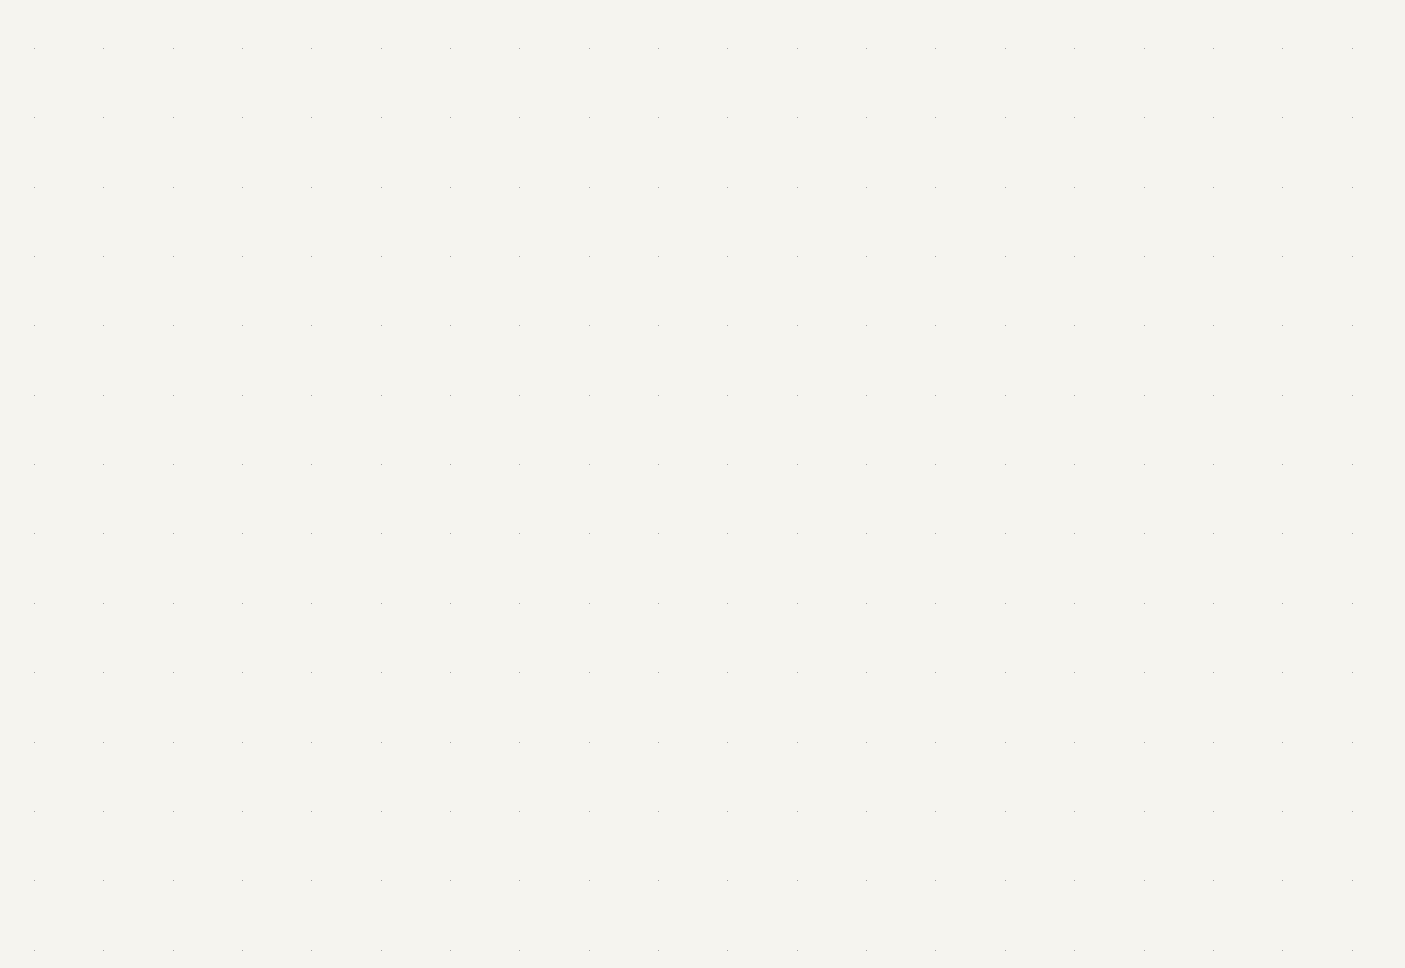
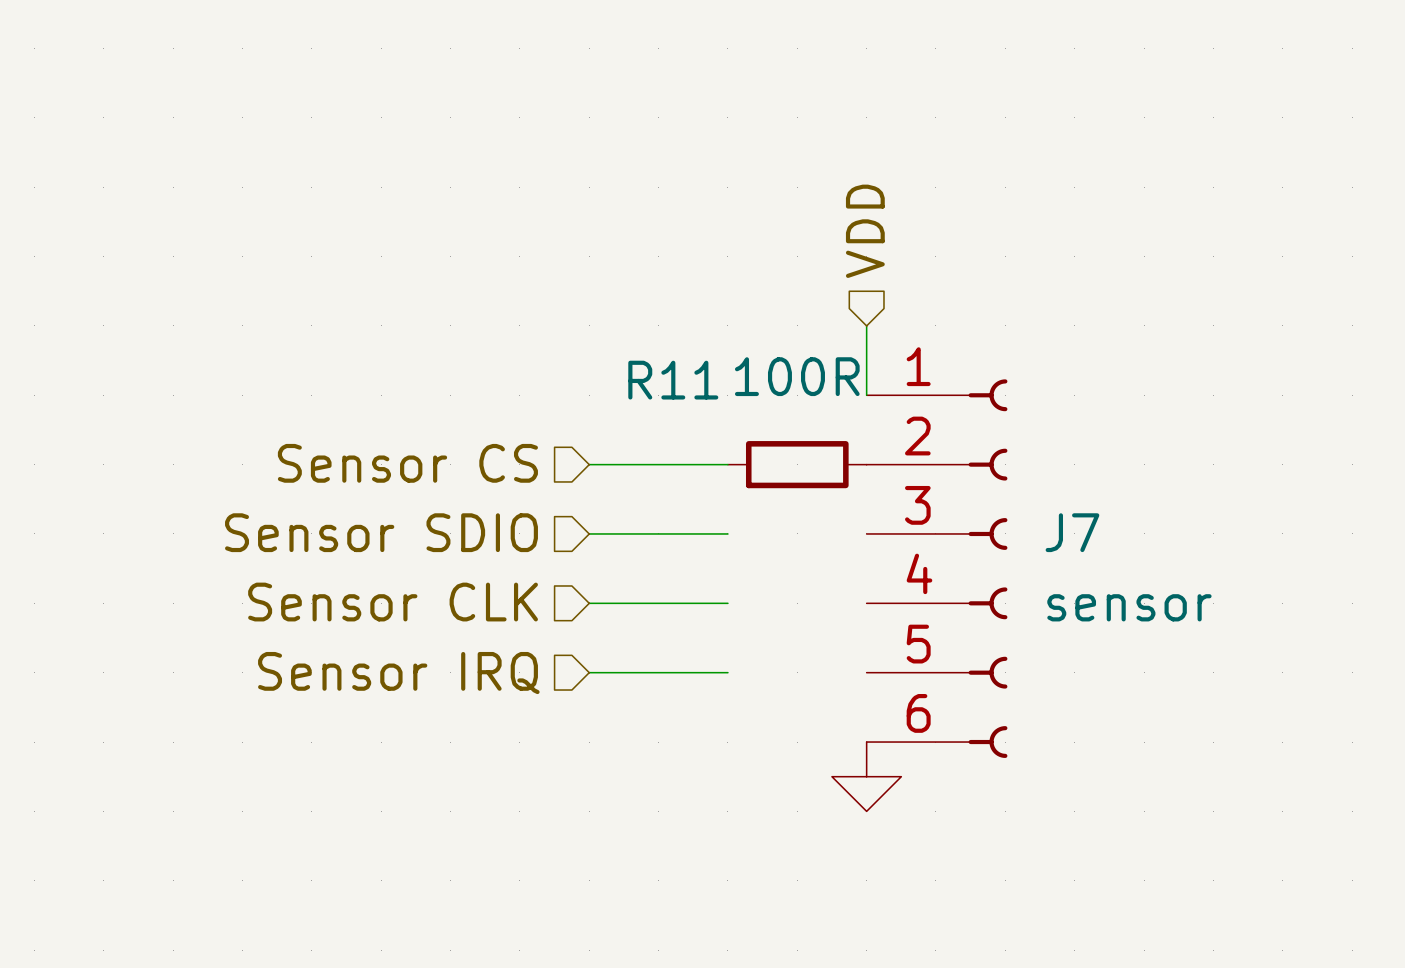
hierarchical label: none -> VDD (865, 231)
wire: none -> (866, 325) (866, 395)
hierarchical label: none -> Sensor CS (407, 463)
wire: none -> (589, 464) (727, 464)
R11: none -> 100R (797, 464)
hierarchical label: none -> Sensor SDIO (381, 532)
wire: none -> (589, 533) (727, 533)
J7: none -> sensor (937, 568)
hierarchical label: none -> Sensor CLK (393, 602)
wire: none -> (589, 603) (727, 603)
wire: none -> (589, 672) (727, 672)
hierarchical label: none -> Sensor IRQ (398, 673)
power symbol: none -> (866, 776)

